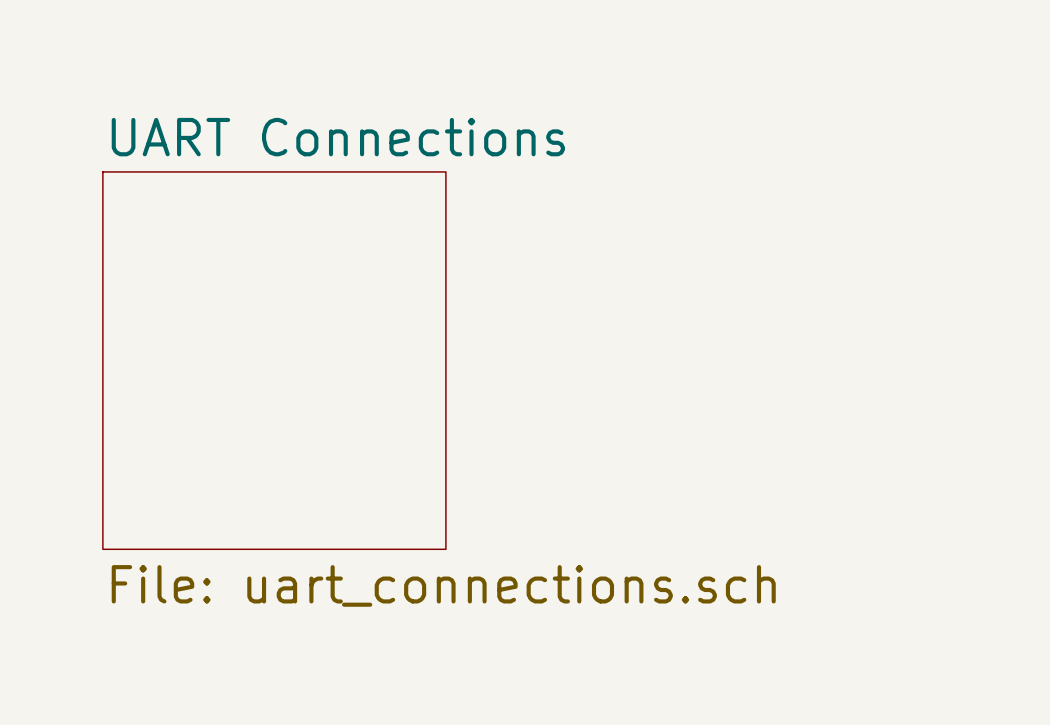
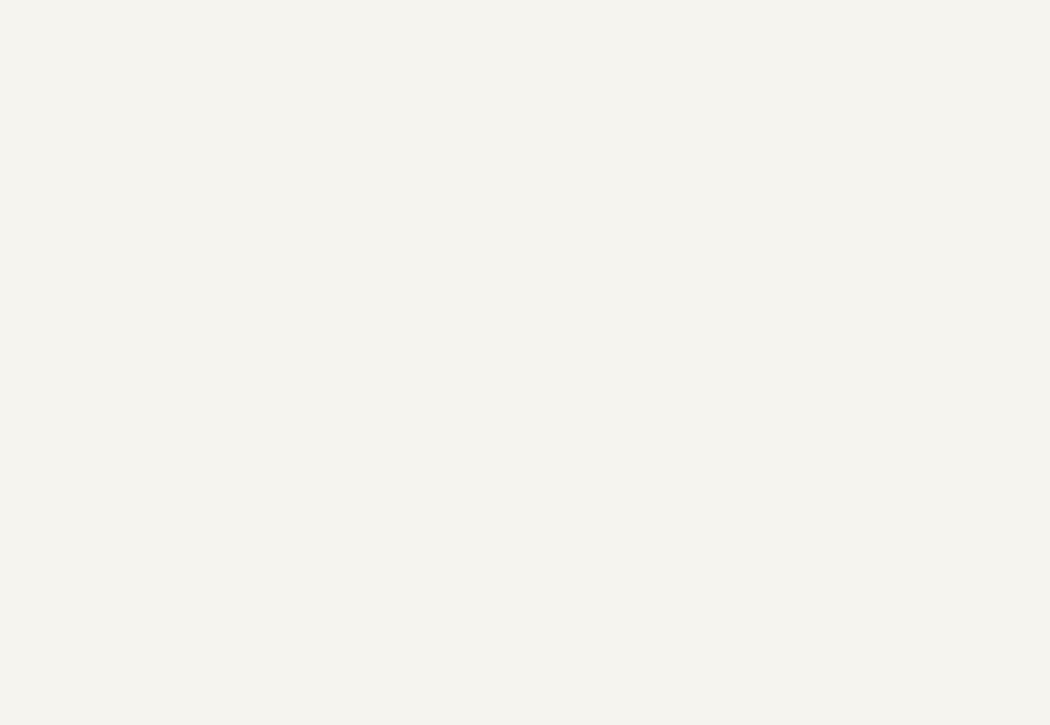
sheet UART Connections: File: uart_connections.sch (274, 360) -> none

